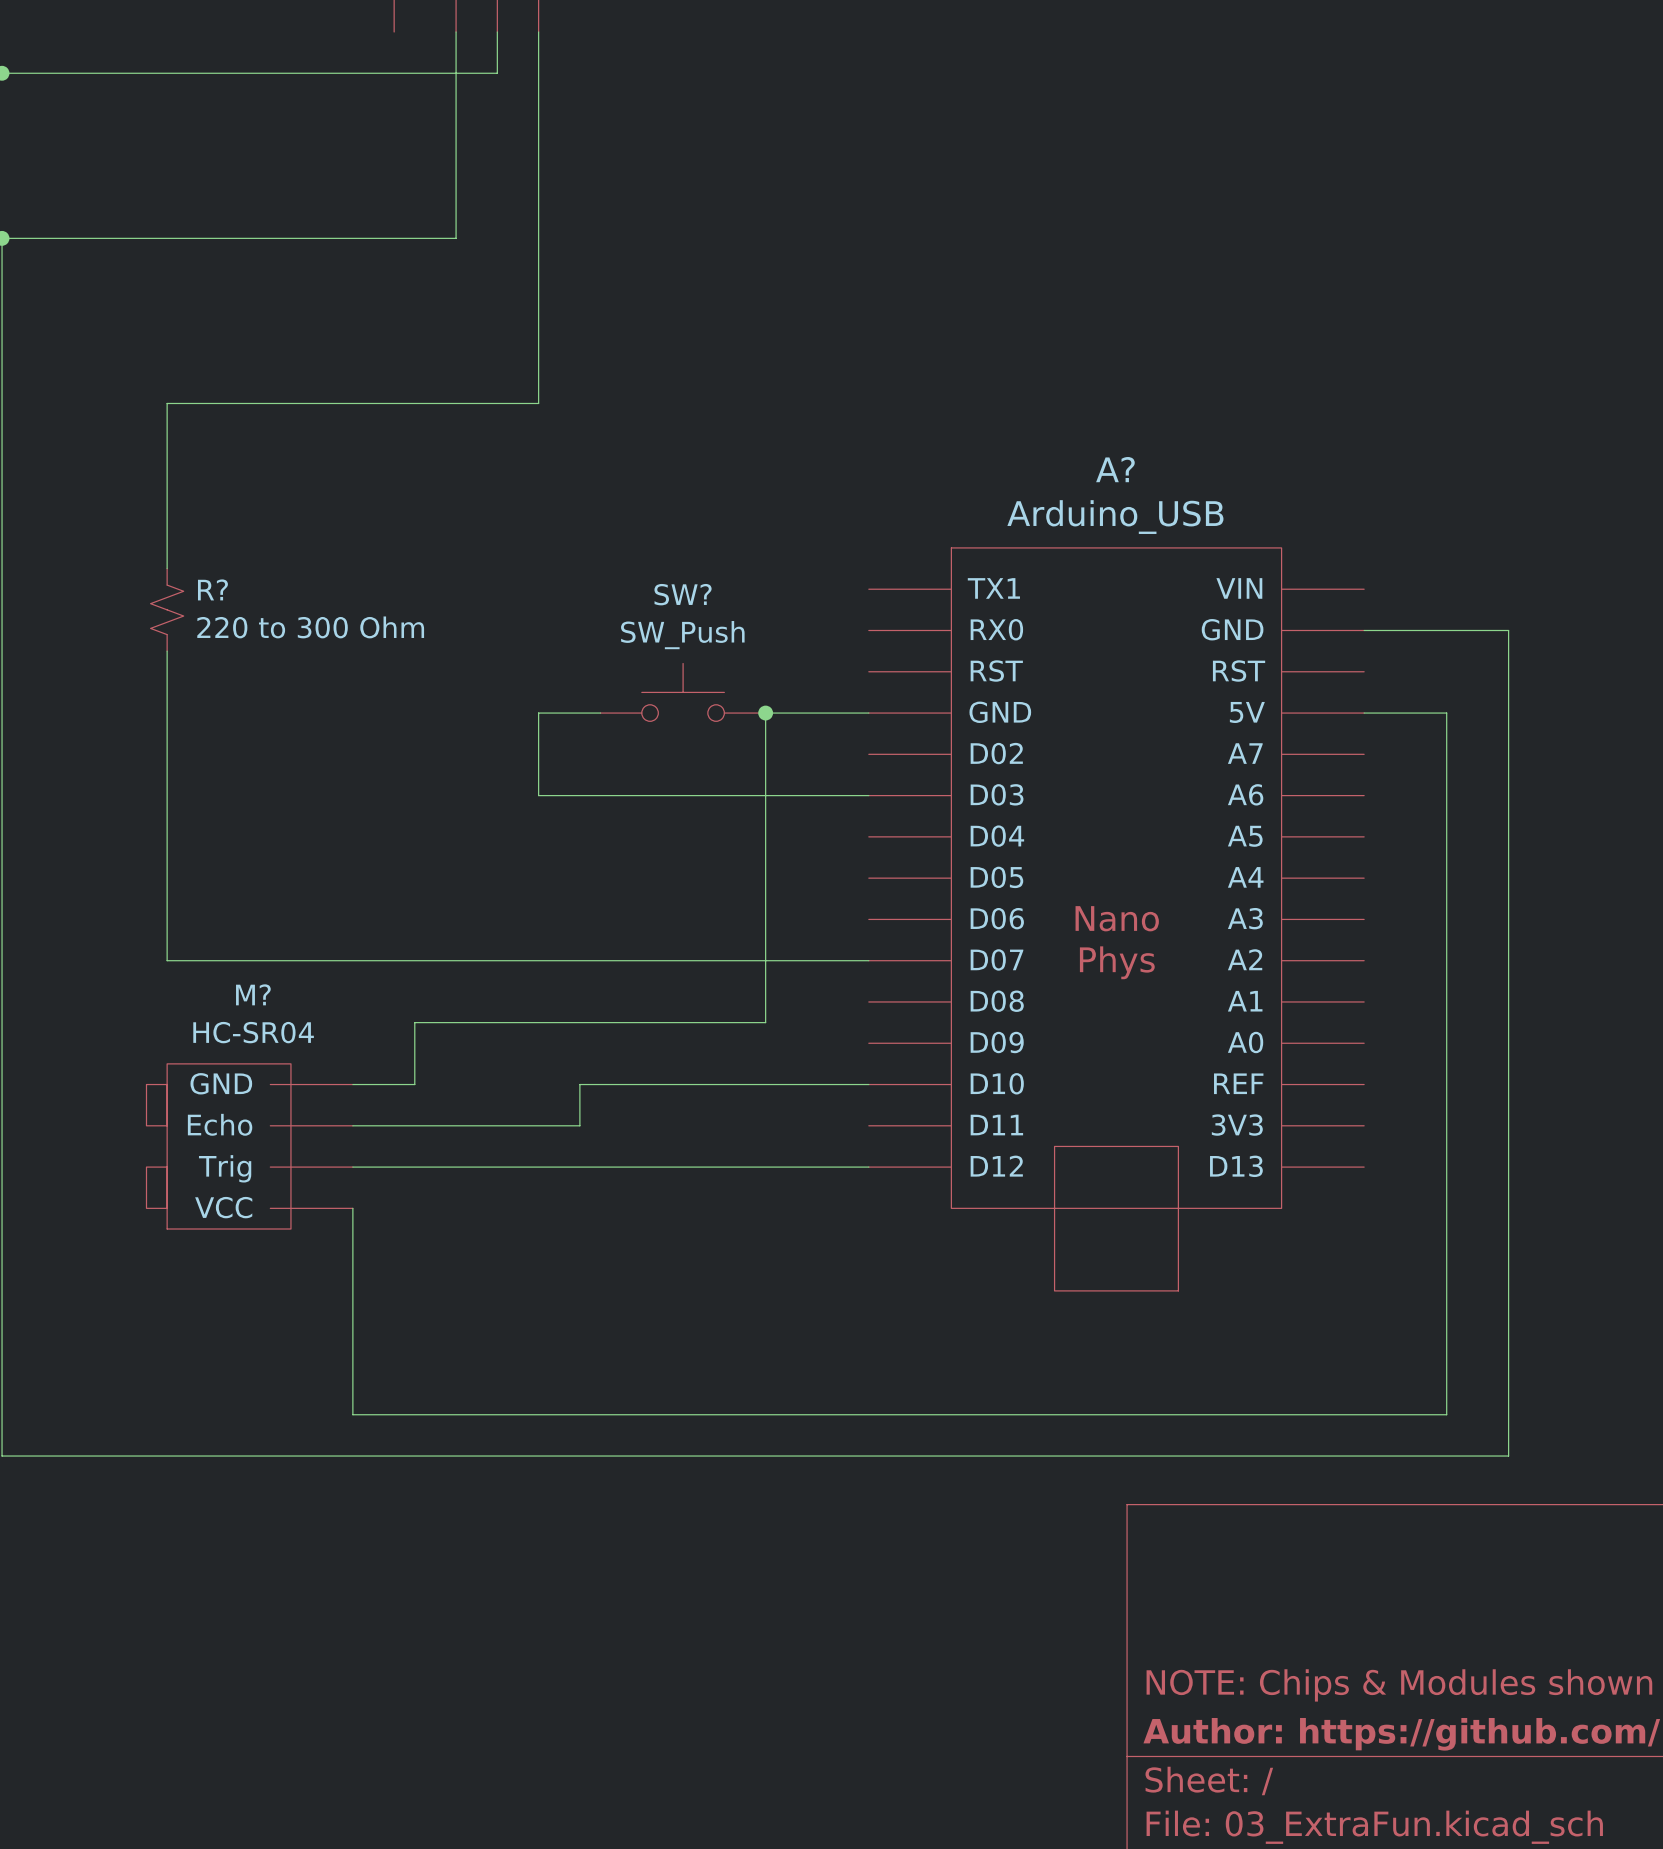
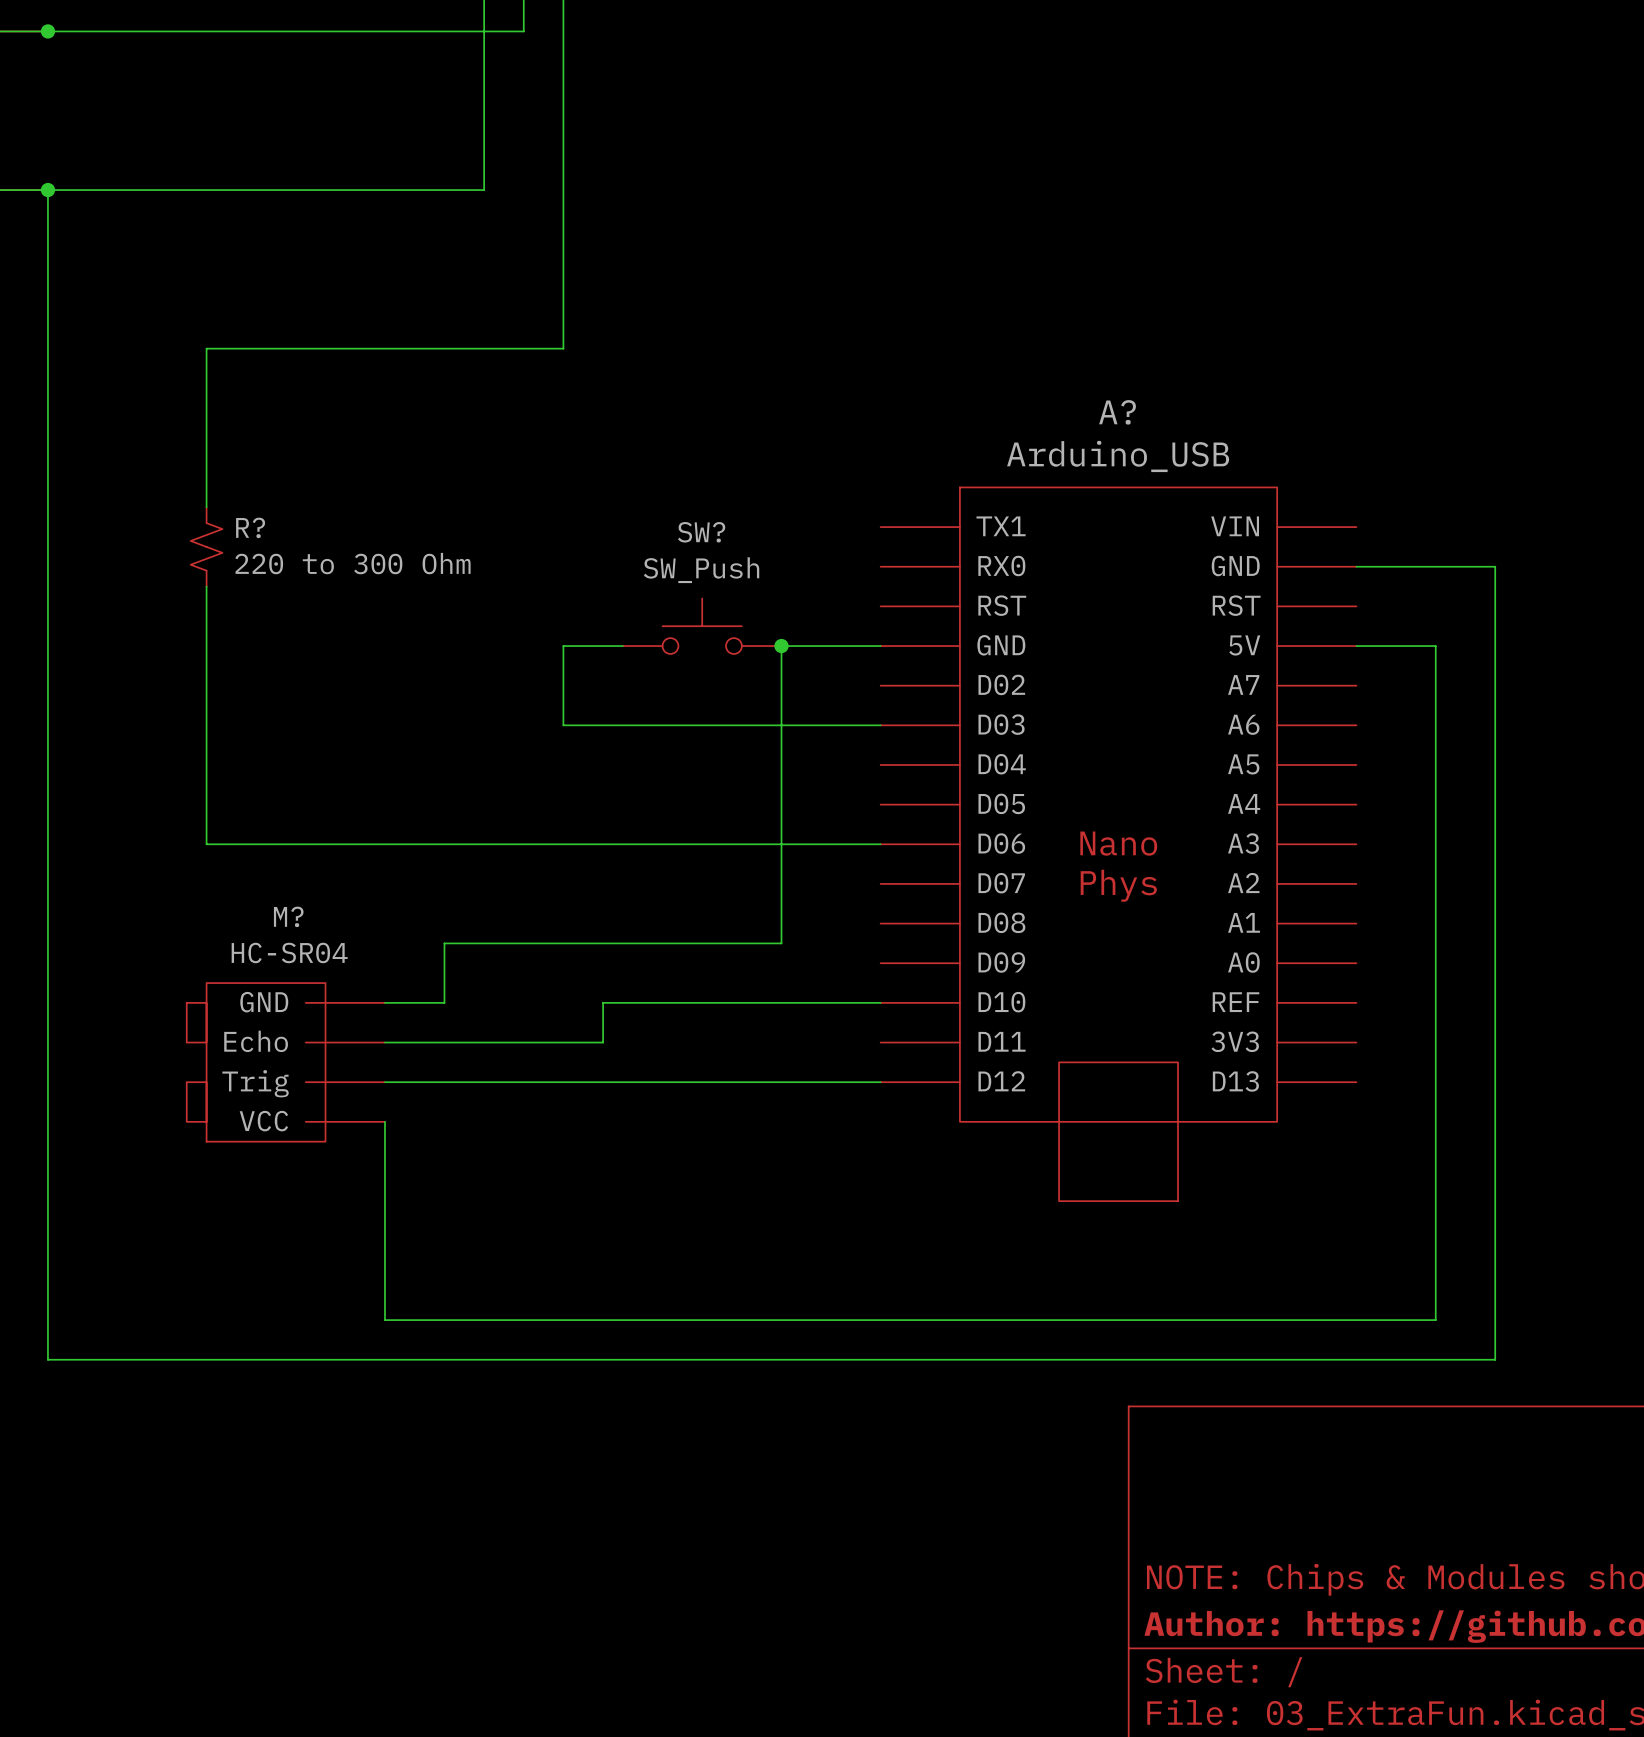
wire: (167, 919) (167, 960) (868, 960) -> (206, 844) (880, 844)

